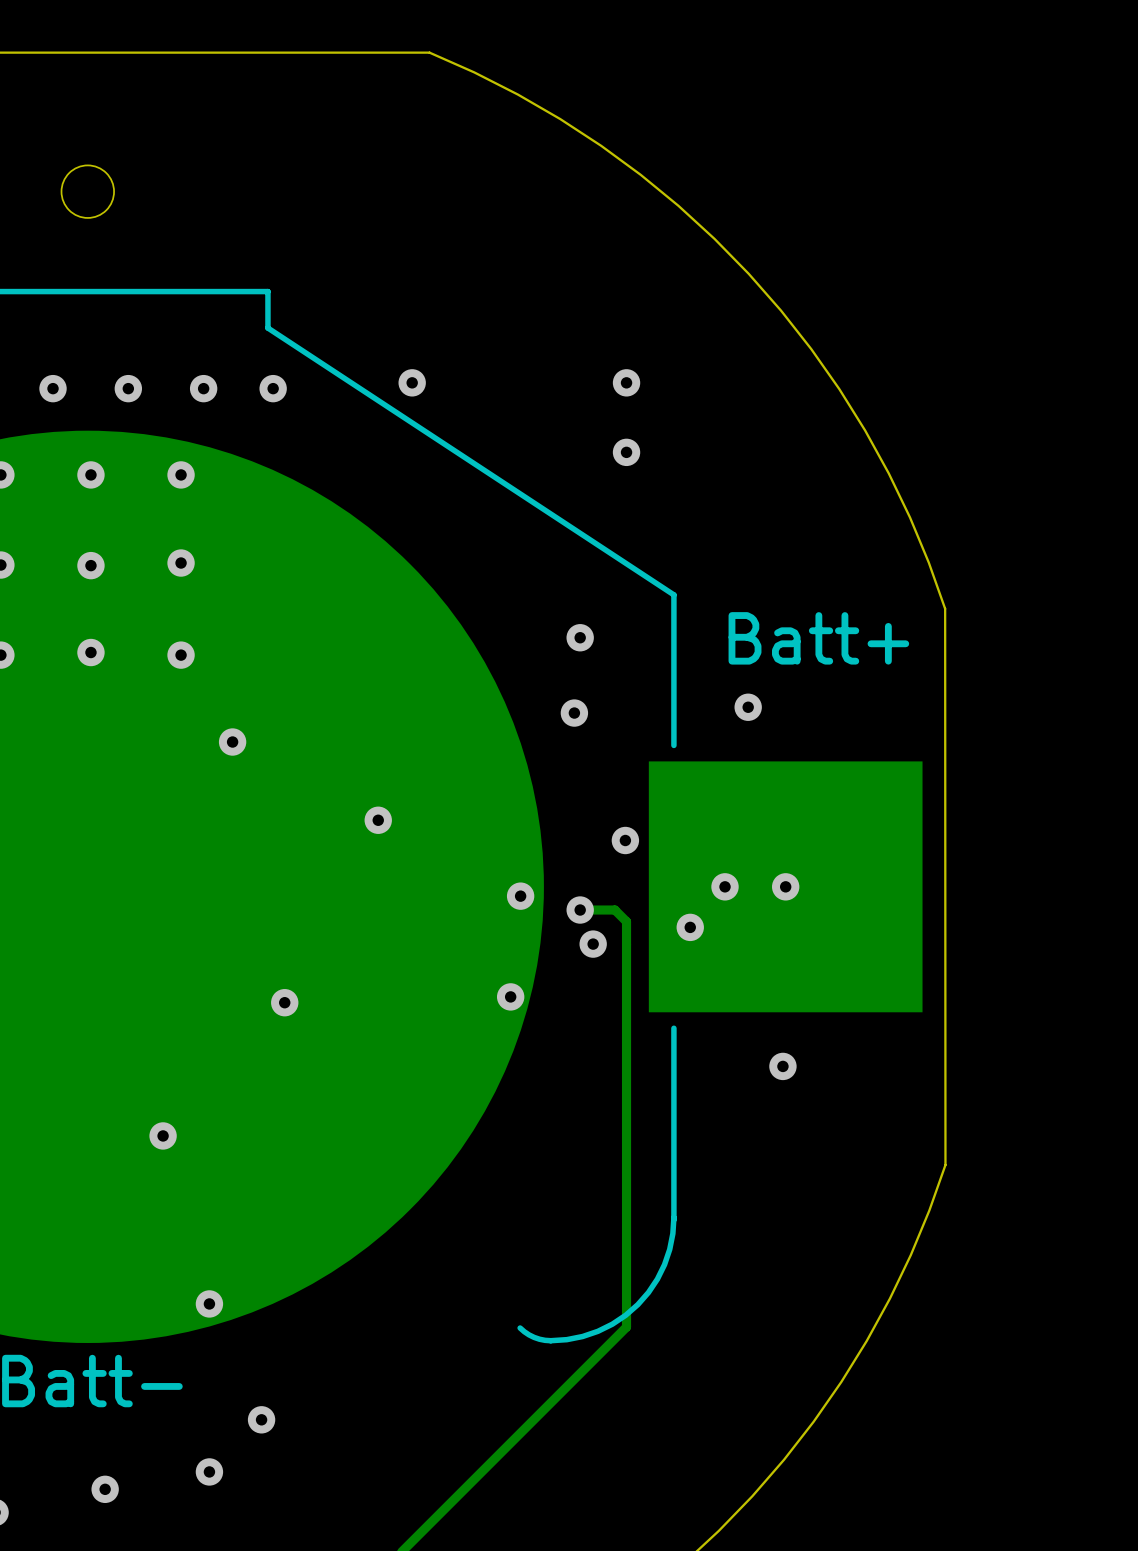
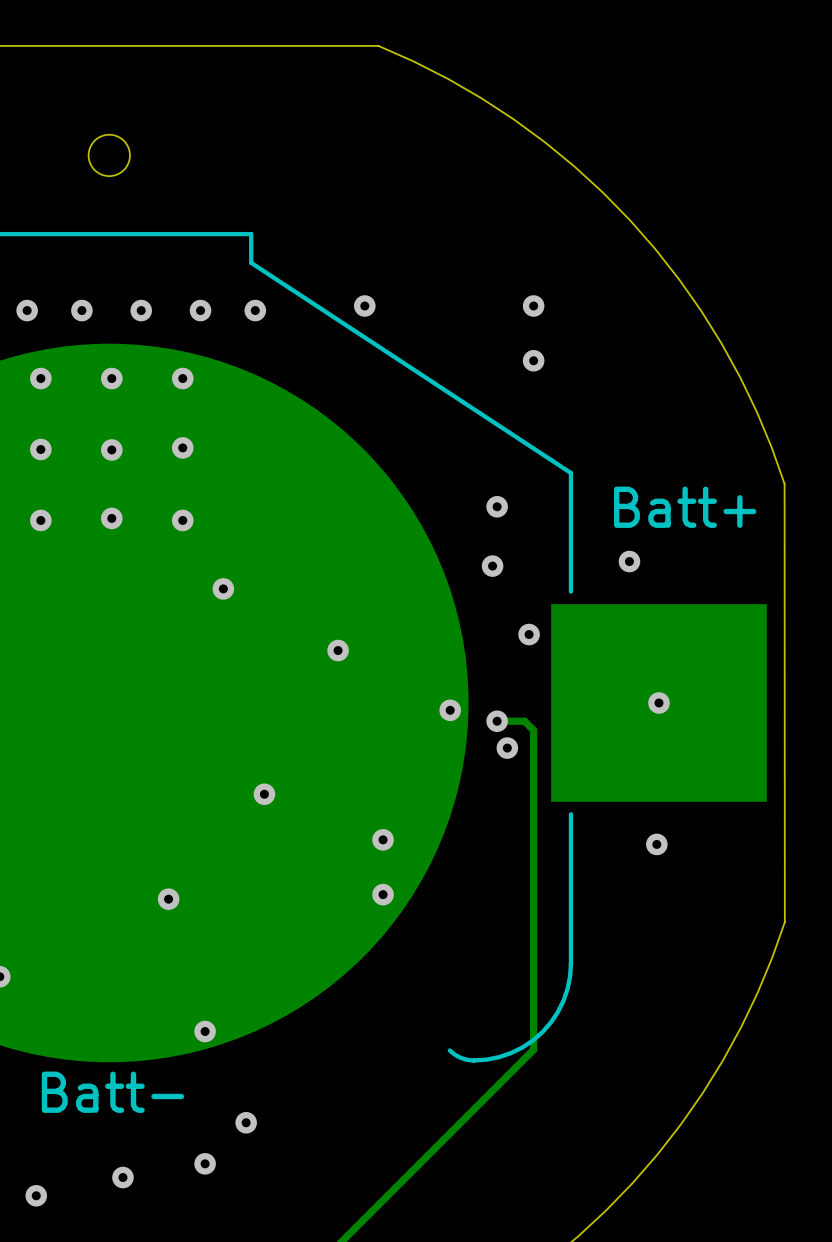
via position: (625, 840) -> (529, 634)
via: (725, 886) -> none
via: (690, 927) -> none
via: (510, 996) -> none
via: none -> (383, 839)
via: none -> (383, 894)

